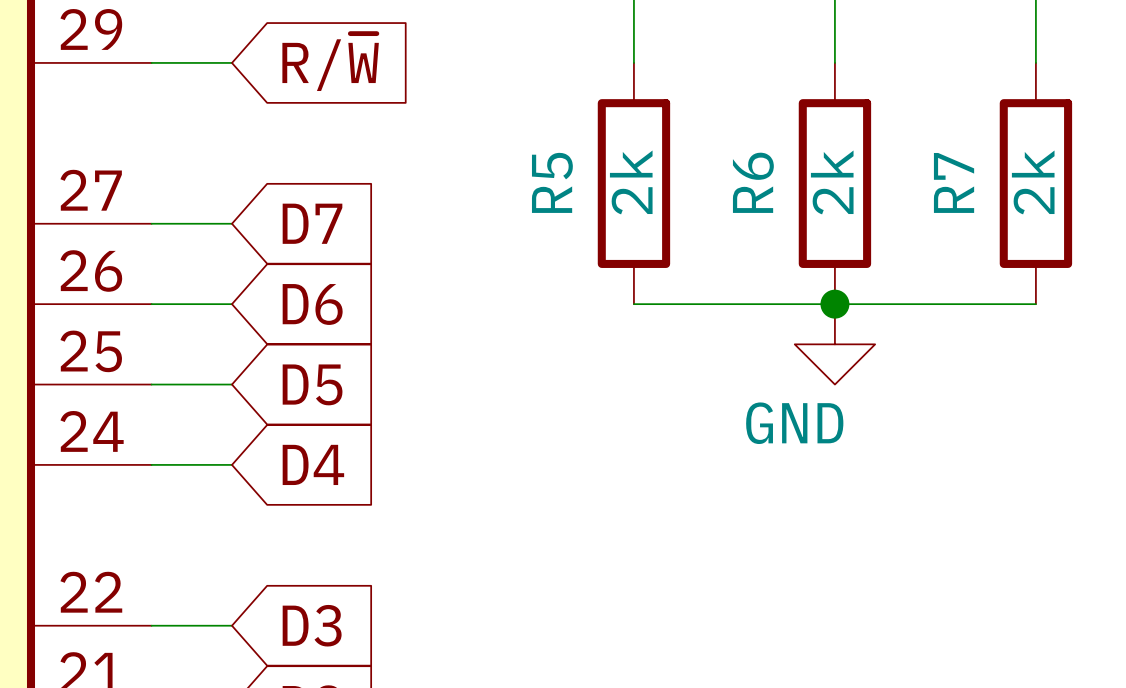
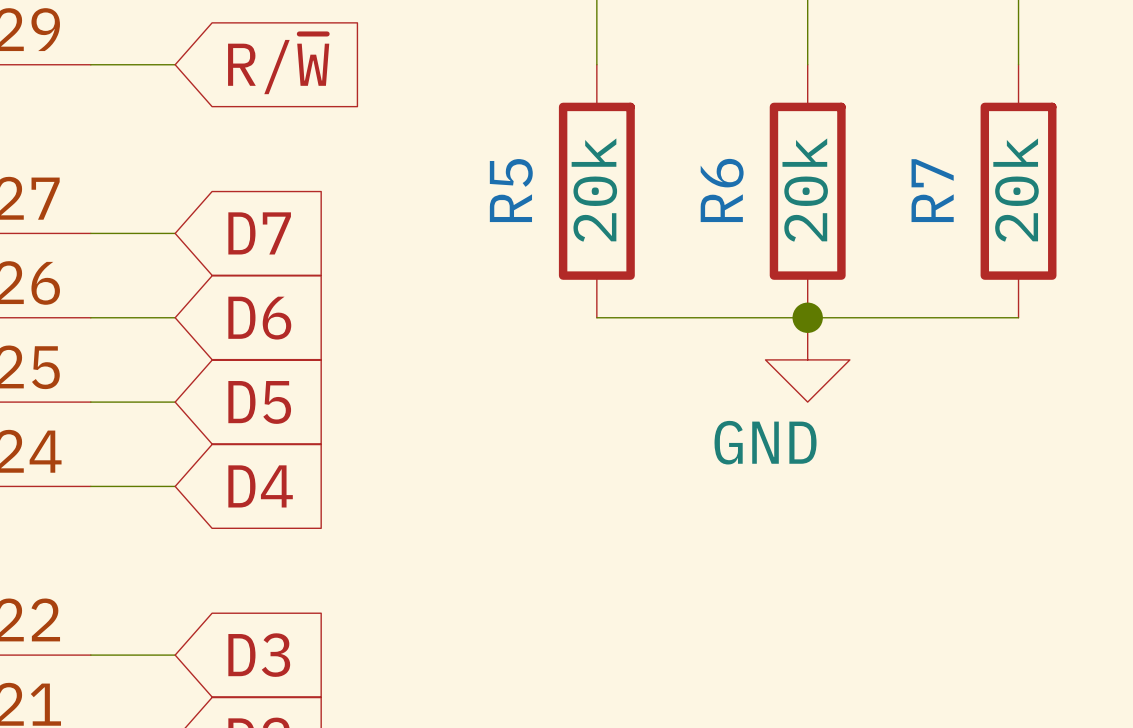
R5 value: 2k (631, 182) -> 20k (594, 190)
R6 value: 2k (832, 182) -> 20k (805, 190)
R7 value: 2k (1033, 182) -> 20k (1016, 190)

